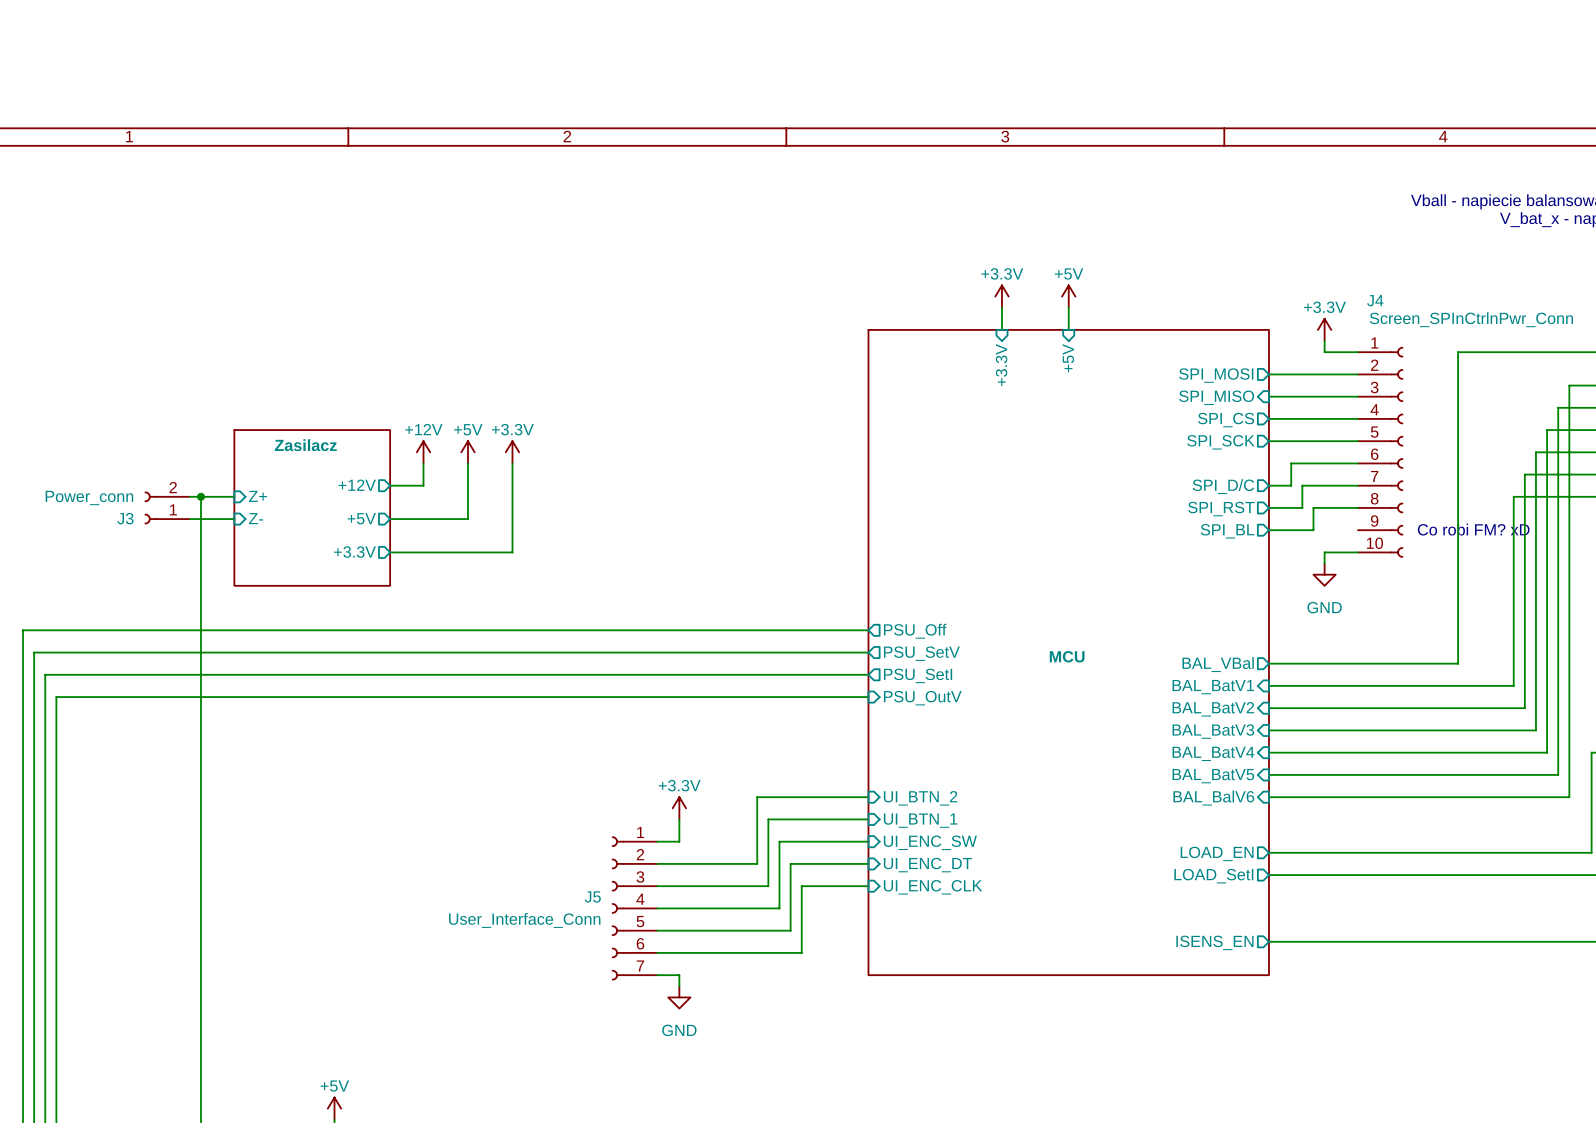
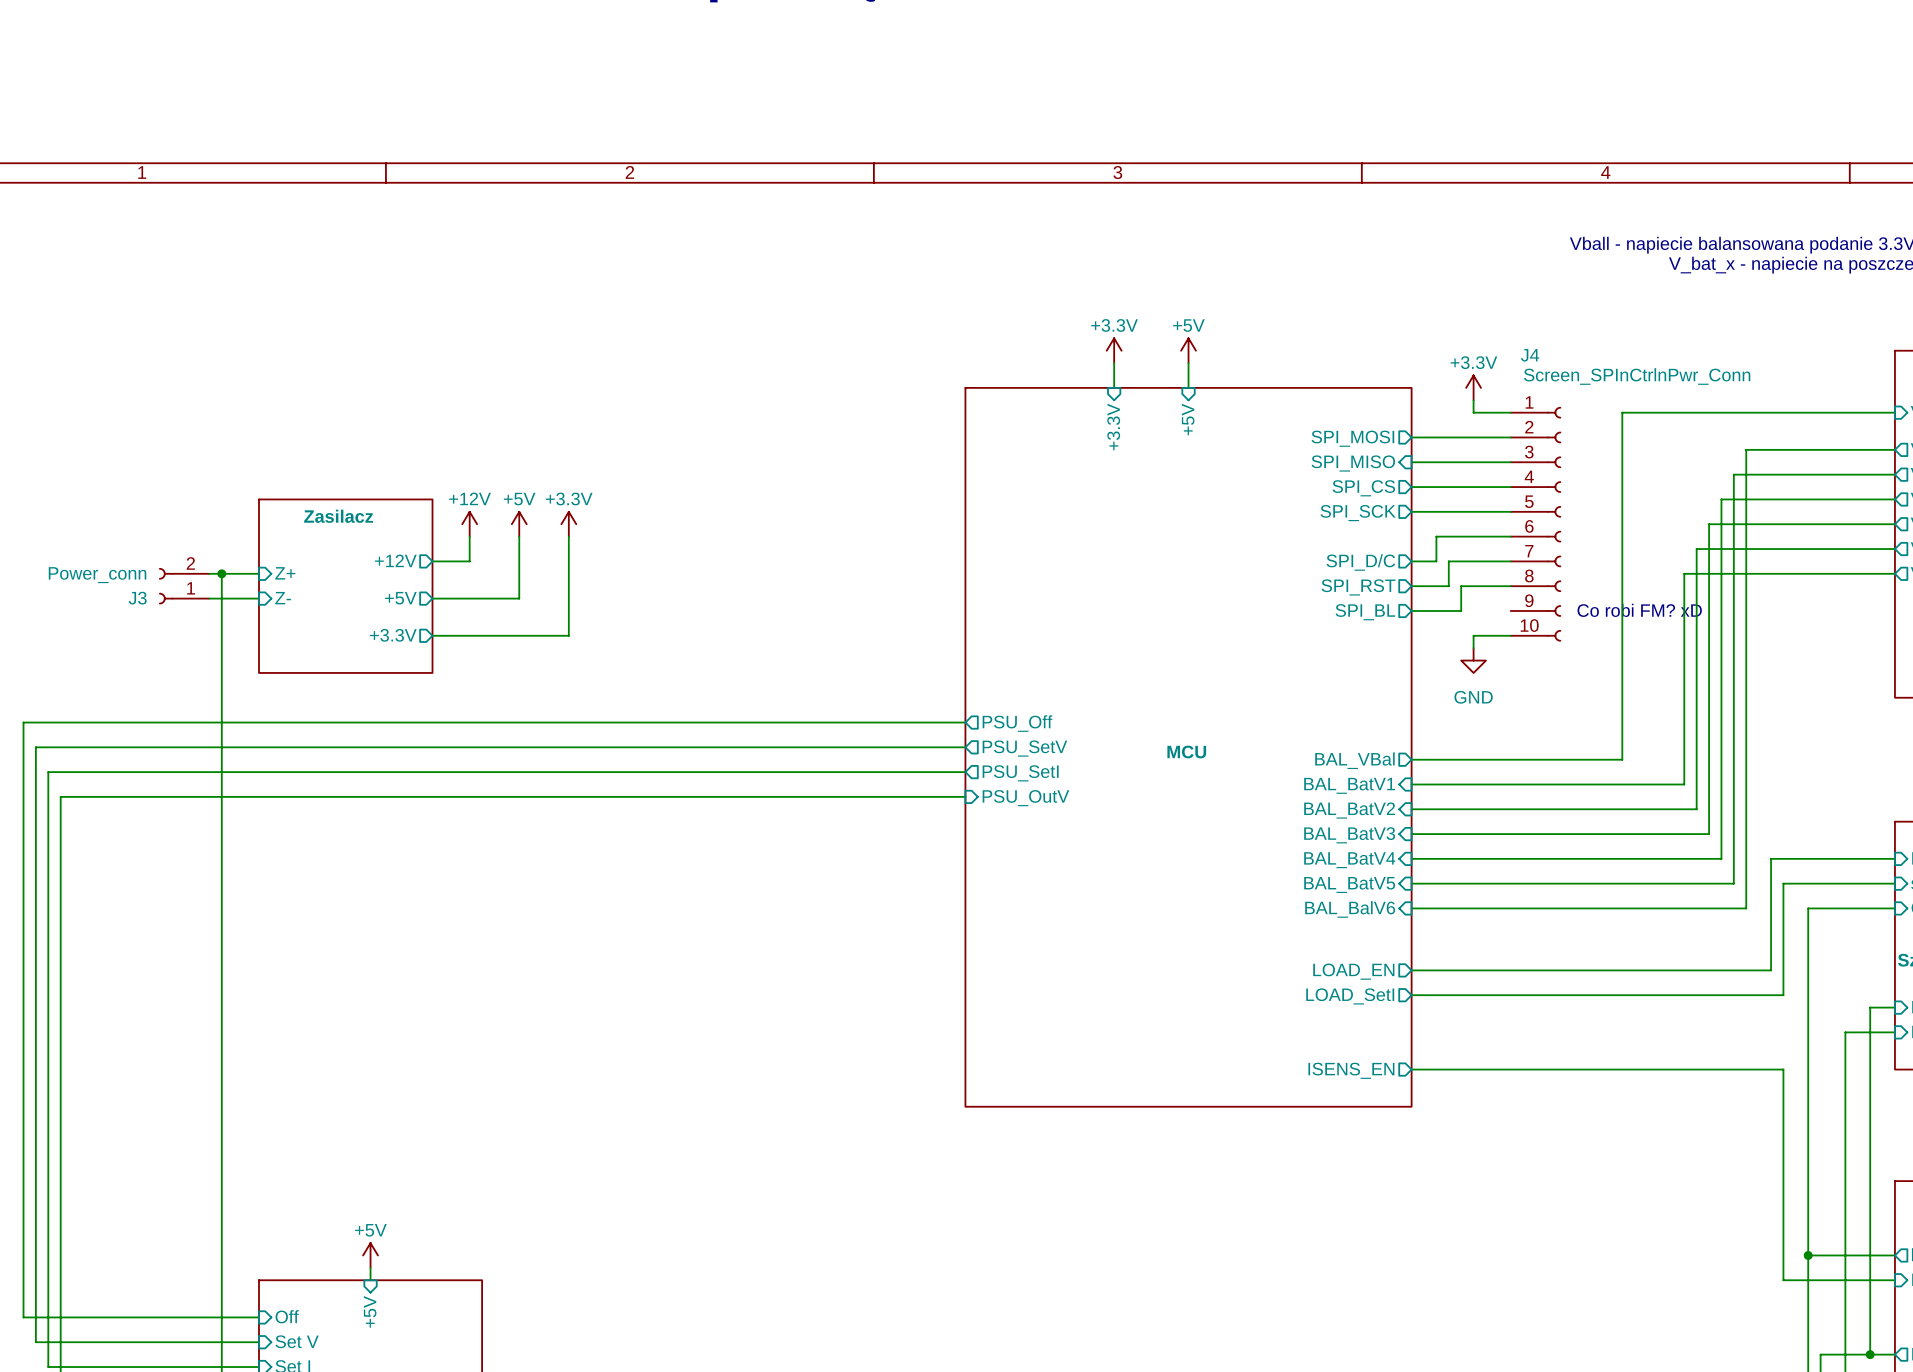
wire: (868, 797) (757, 797) (757, 863) (657, 863) -> none
sheet pin: UI_BTN_2 (920, 798) -> none
power symbol: +3.3V (679, 808) -> none
wire: (679, 819) (679, 841) (657, 841) -> none
wire: (868, 819) (768, 819) (768, 886) (657, 886) -> none
sheet pin: UI_BTN_1 (920, 820) -> none
wire: (868, 841) (779, 841) (779, 908) (657, 908) -> none
sheet pin: UI_ENC_SW (930, 842) -> none
wire: (868, 863) (790, 863) (790, 930) (657, 930) -> none
sheet pin: UI_ENC_DT (927, 865) -> none
wire: (868, 886) (801, 886) (801, 952) (657, 952) -> none
sheet pin: UI_ENC_CLK (933, 887) -> none
J5: User_Interface_Conn (634, 908) -> none
wire: (657, 975) (679, 975) (679, 986) -> none
power symbol: GND (679, 997) -> none

